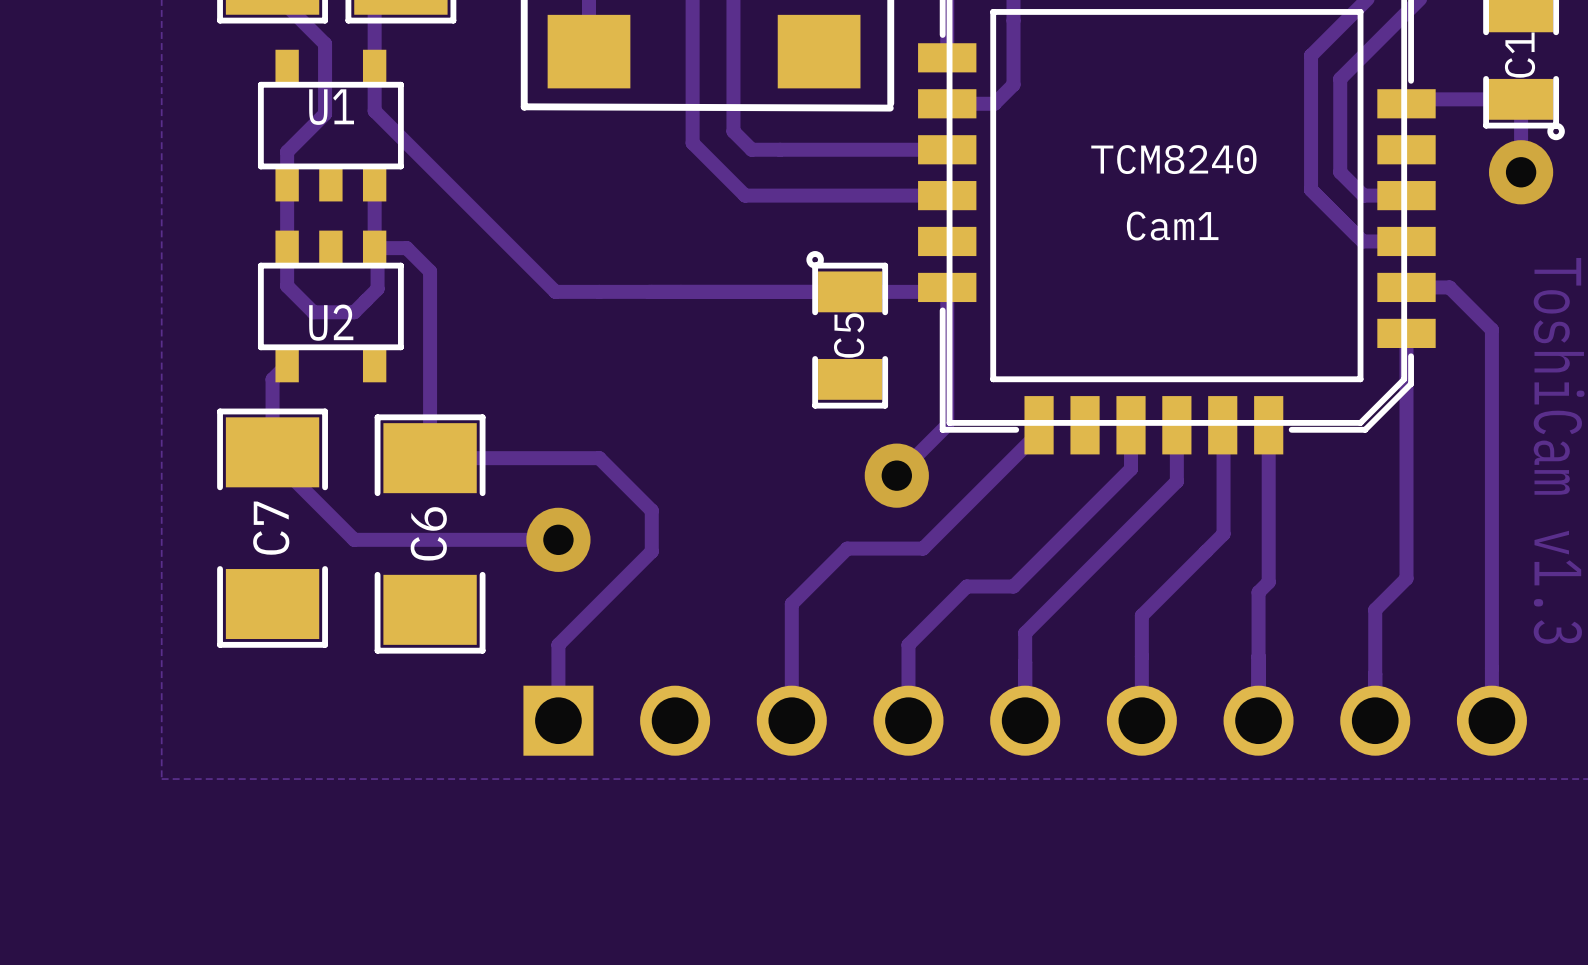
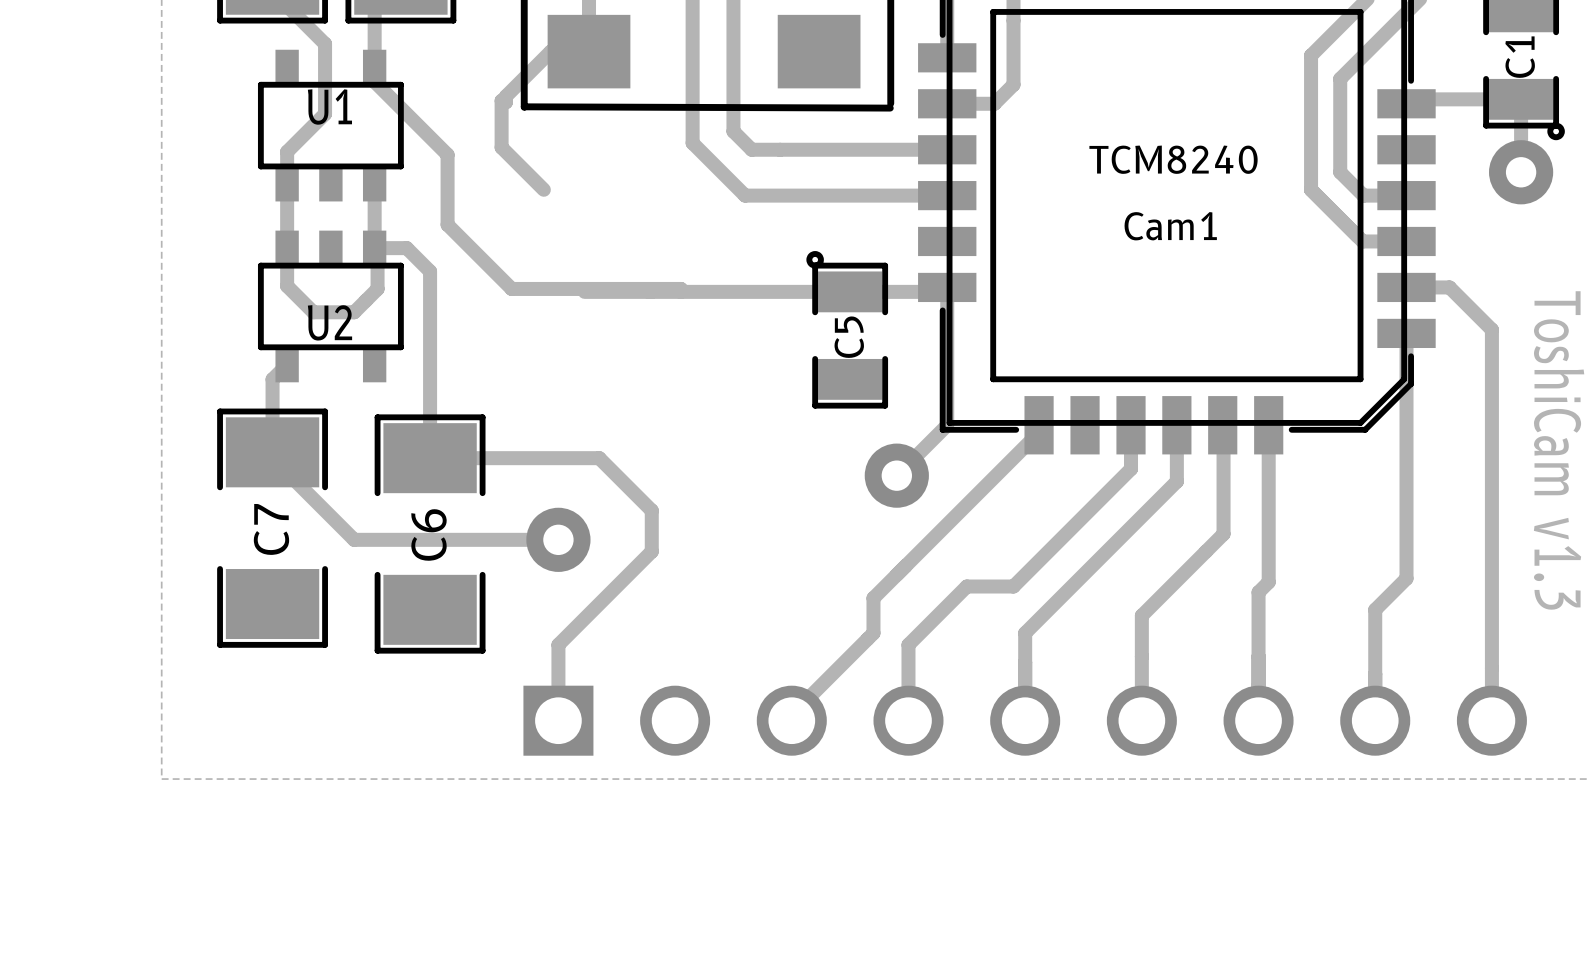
track: none -> (589, 51) (550, 51) (505, 96) (505, 102) (501, 100) (501, 147) (543, 189)
track: (374, 81) (374, 111) (555, 291) (584, 291) -> (374, 81) (447, 154) (447, 224) (511, 288) (680, 288) (680, 291)
track: (923, 548) (847, 548) (791, 604) (791, 714) -> (923, 548) (873, 598) (873, 633) (791, 714)

